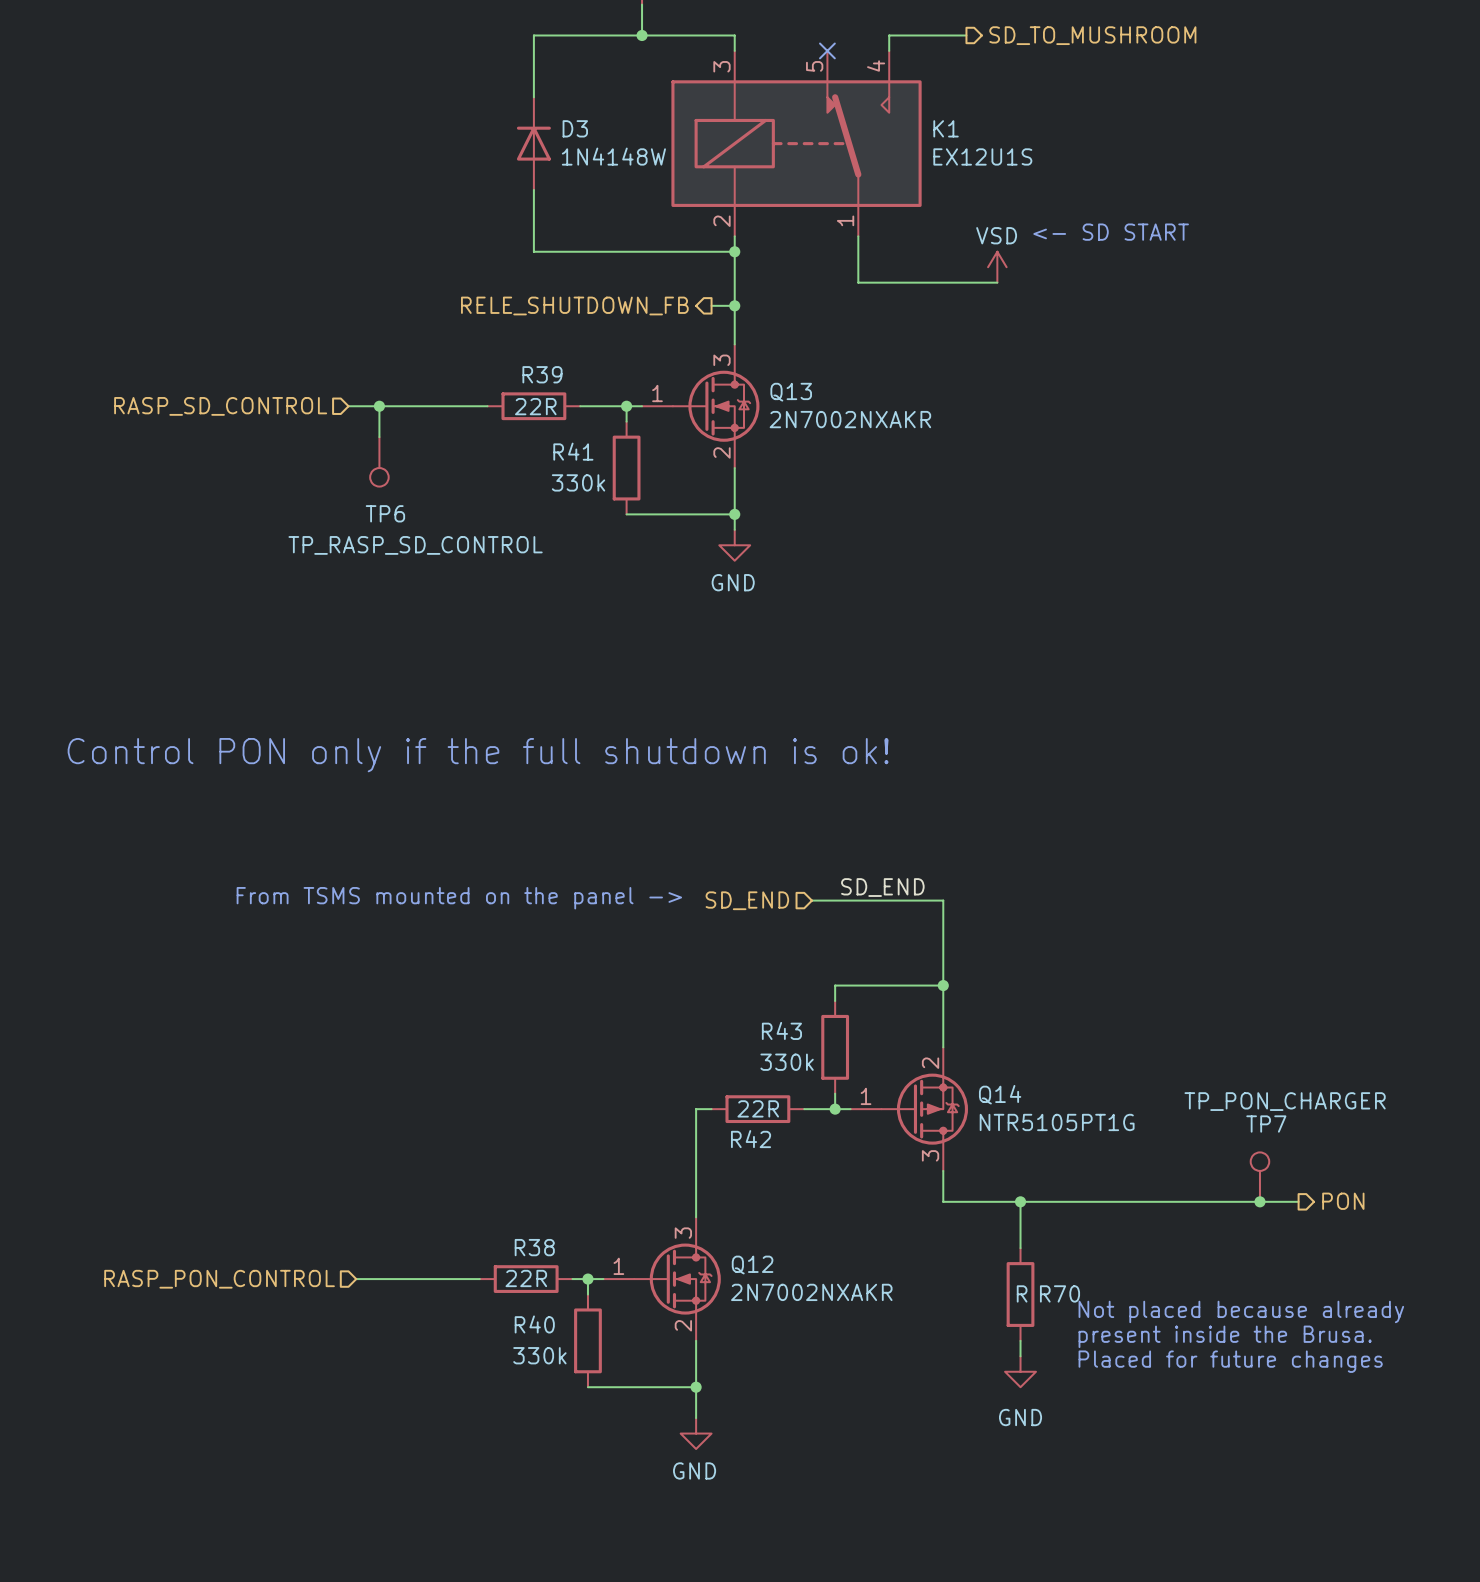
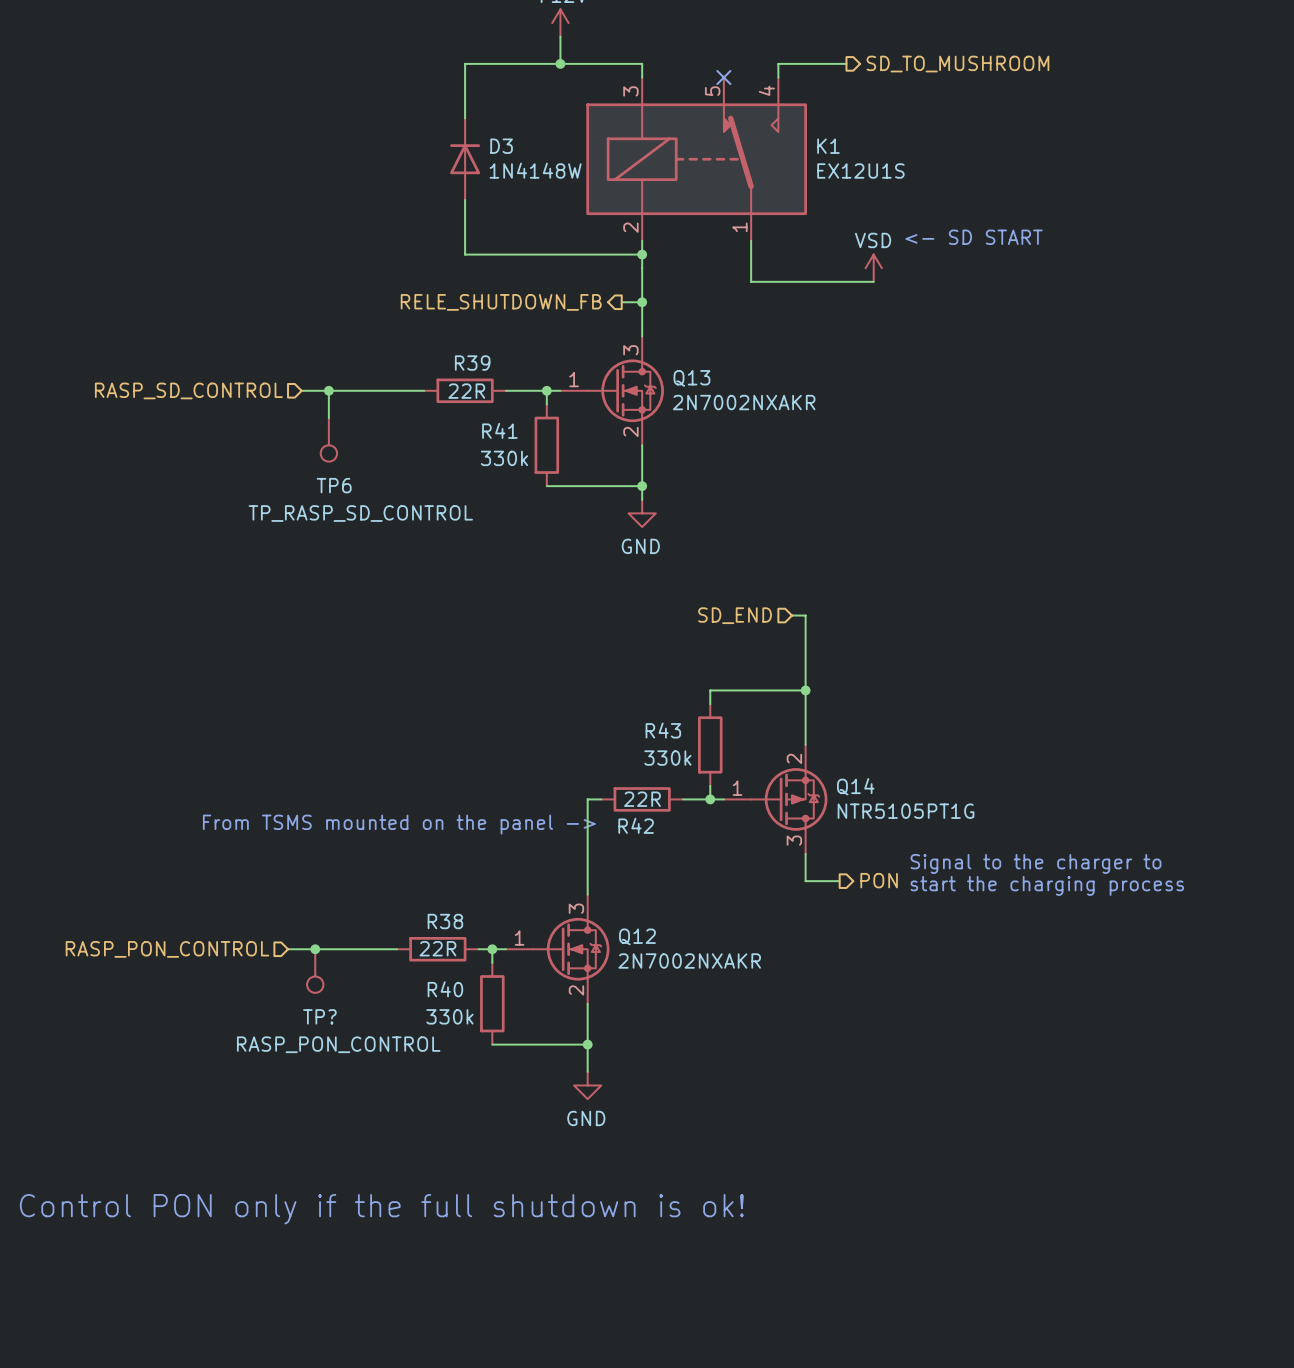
wire: none -> (791, 615) (805, 615) (805, 744)
junction: none -> (805, 690)
text: Control PON only if the full shutdown is ok! (478, 755) -> none
junction: none -> (710, 799)
label: SD_END (882, 887) -> none
hierarchical label position: SD_END (747, 900) -> SD_END (735, 615)
wire: (811, 900) (943, 900) (943, 985) -> none
wire: none -> (805, 853) (805, 881) (839, 881)
text: none -> Signal to the charger to (1035, 863)
hierarchical label: none -> PON (879, 880)
text: none -> start the charging process (1047, 885)
wire: (943, 985) (835, 985) (835, 1001) -> (805, 690) (710, 690) (710, 704)
wire: (943, 985) (943, 1047) -> none
junction: (943, 985) -> none
junction: none -> (315, 949)
junction: none -> (492, 949)
R43 position: (835, 1047) -> (710, 744)
TP?: none -> RASP_PON_CONTROL (315, 971)
wire: (835, 1093) (835, 1109) -> (710, 785) (710, 799)
wire: (711, 1109) (696, 1109) (696, 1217) -> (601, 799) (587, 799) (587, 894)
R42 position: (757, 1109) -> (642, 799)
wire: (804, 1109) (850, 1109) -> (683, 799) (723, 799)
junction: (835, 1109) -> none
Q14 position: (909, 1109) -> (775, 799)
junction: none -> (587, 1044)
wire: (943, 1170) (943, 1201) (1298, 1201) -> none
TP7: TP_PON_CHARGER (1259, 1177) -> none
power symbol: none -> GND (587, 1085)
wire: (1020, 1201) (1020, 1248) -> none
junction: (1020, 1201) -> none
junction: (1259, 1201) -> none
hierarchical label: PON (1343, 1201) -> none
hierarchical label position: RASP_PON_CONTROL (219, 1279) -> RASP_PON_CONTROL (167, 949)
wire: (356, 1279) (479, 1279) -> (288, 949) (396, 949)
R38 position: (526, 1279) -> (437, 949)
wire: (572, 1279) (603, 1279) -> (478, 949) (505, 949)
wire: (587, 1279) (587, 1294) -> (492, 949) (492, 962)
junction: (587, 1279) -> none
Q12 position: (662, 1279) -> (557, 949)
R70: R (1020, 1294) -> none
text: Not placed because already (1241, 1311) -> none
text: none -> Control PON only if the full shutdown is ok! (381, 1209)
text: present inside the Brusa. (1225, 1336) -> none
R40 position: (587, 1340) -> (492, 1003)
wire: (696, 1340) (696, 1418) -> (587, 1003) (587, 1071)
wire: (1020, 1340) (1020, 1356) -> none
text: Placed for future changes (1230, 1361) -> none
power symbol: GND (1020, 1371) -> none
wire: (587, 1387) (696, 1387) -> (492, 1044) (587, 1044)
junction: (696, 1387) -> none
power symbol: GND (696, 1433) -> none

